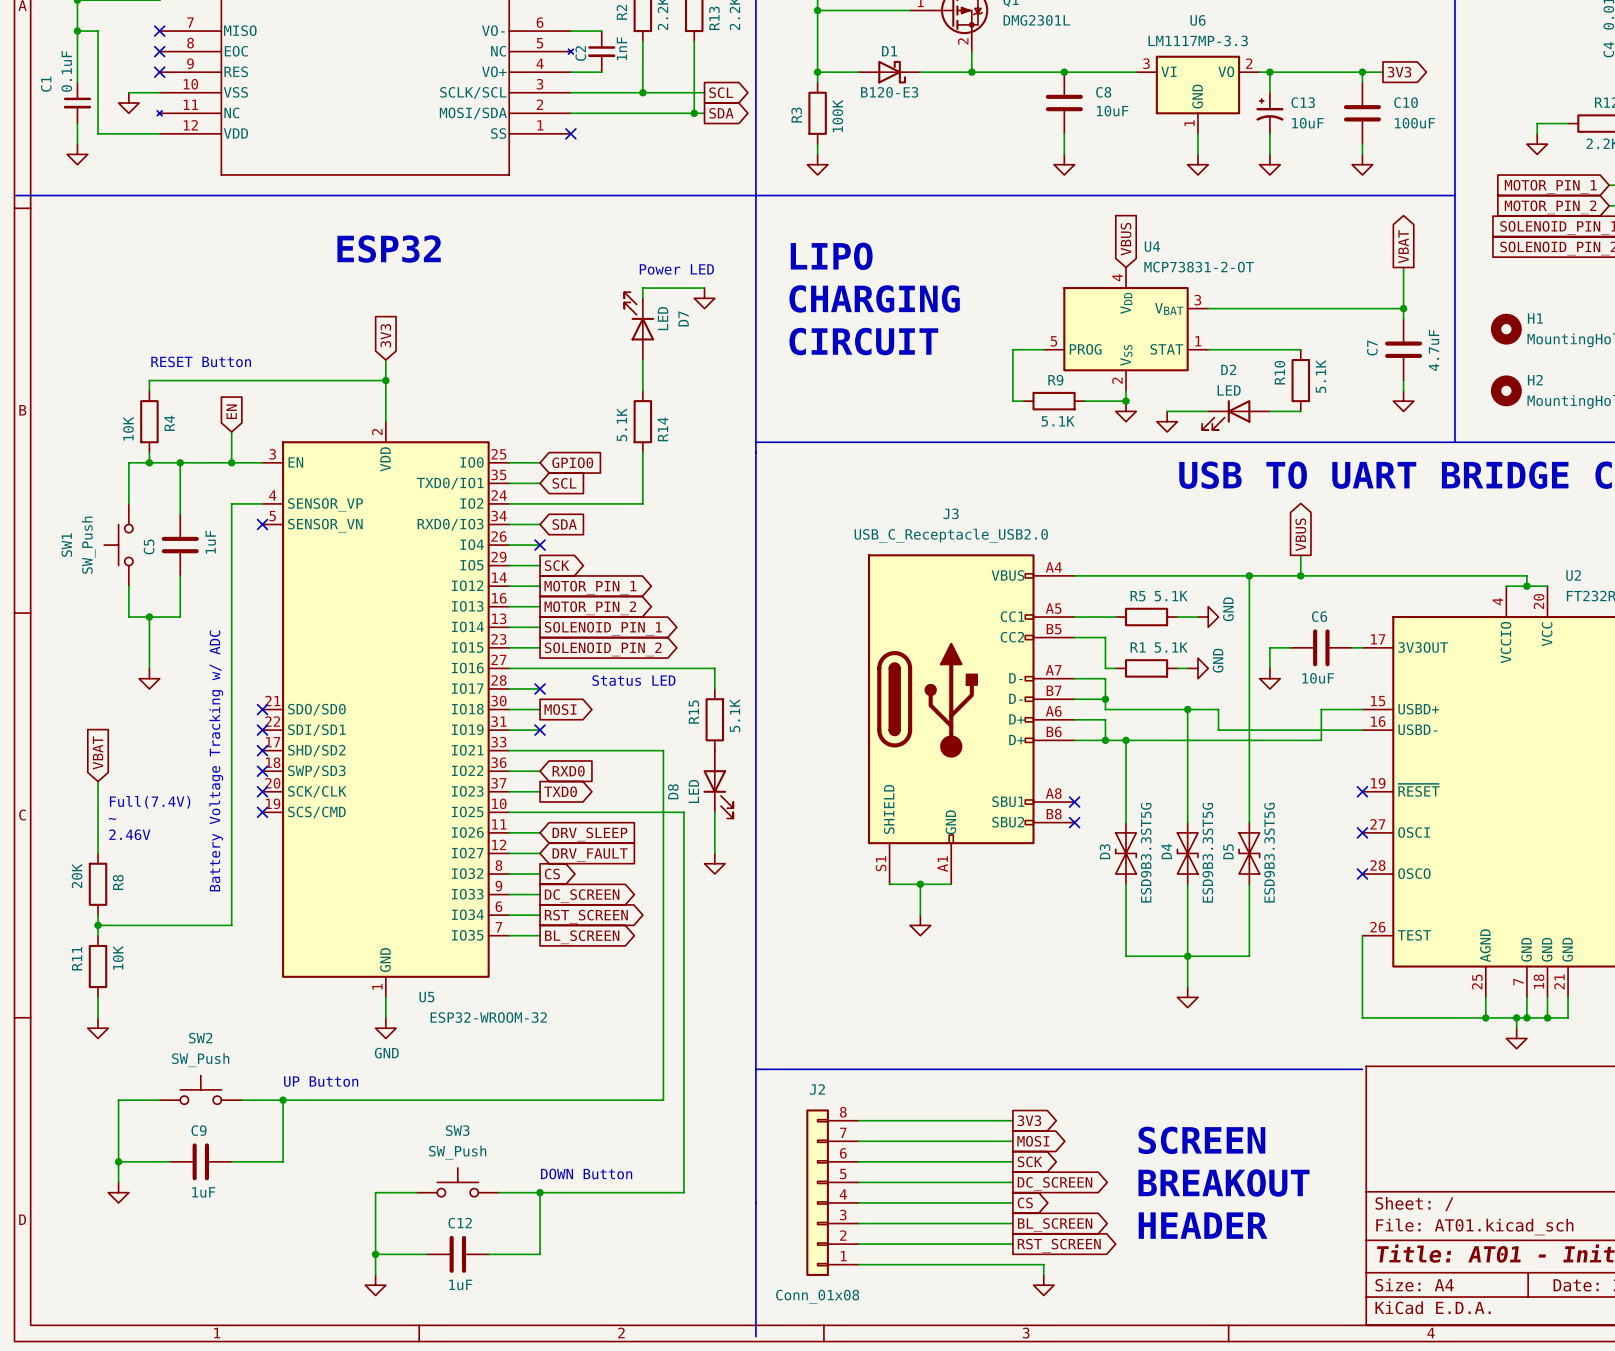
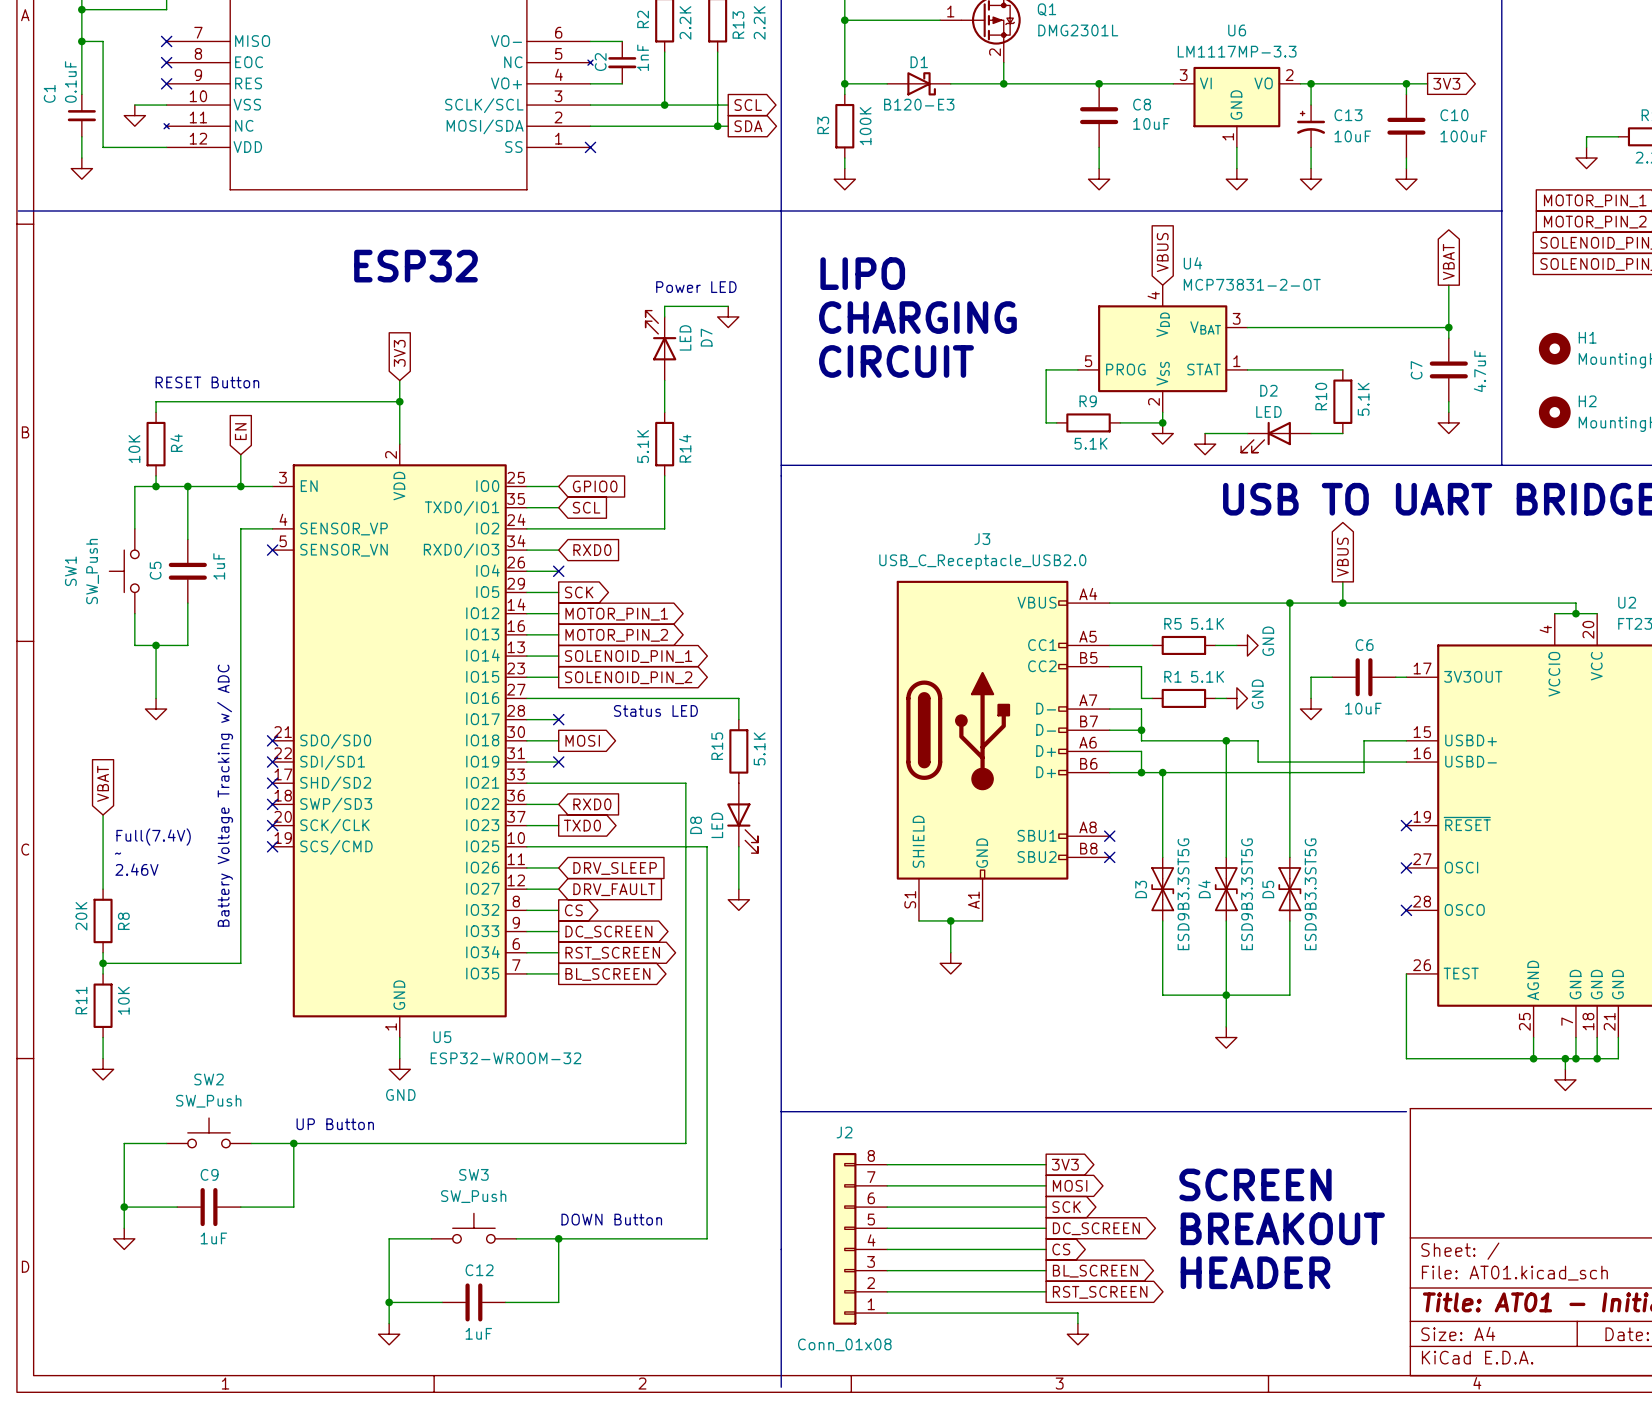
global label: SDA (564, 524) -> RXD0 (592, 550)

